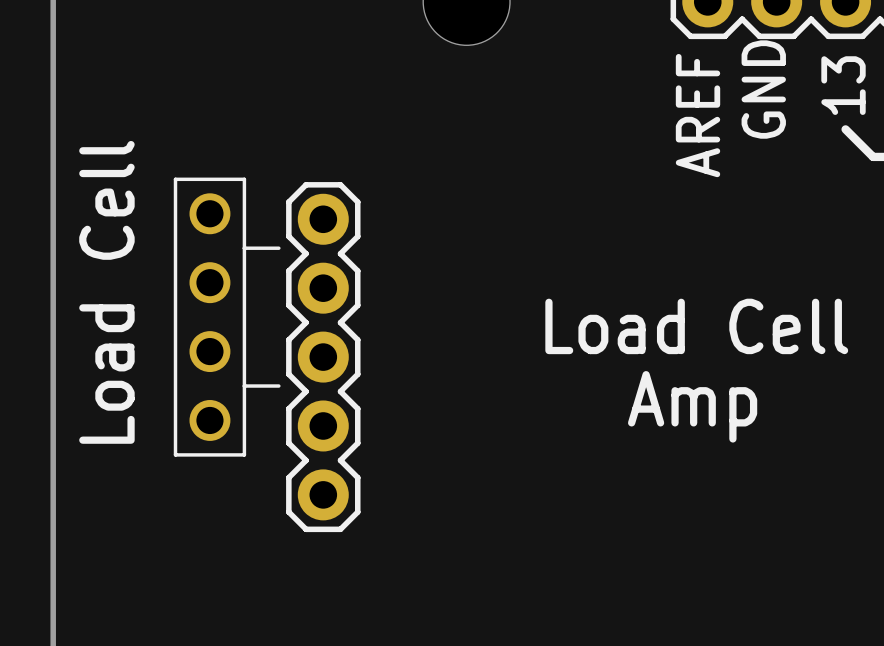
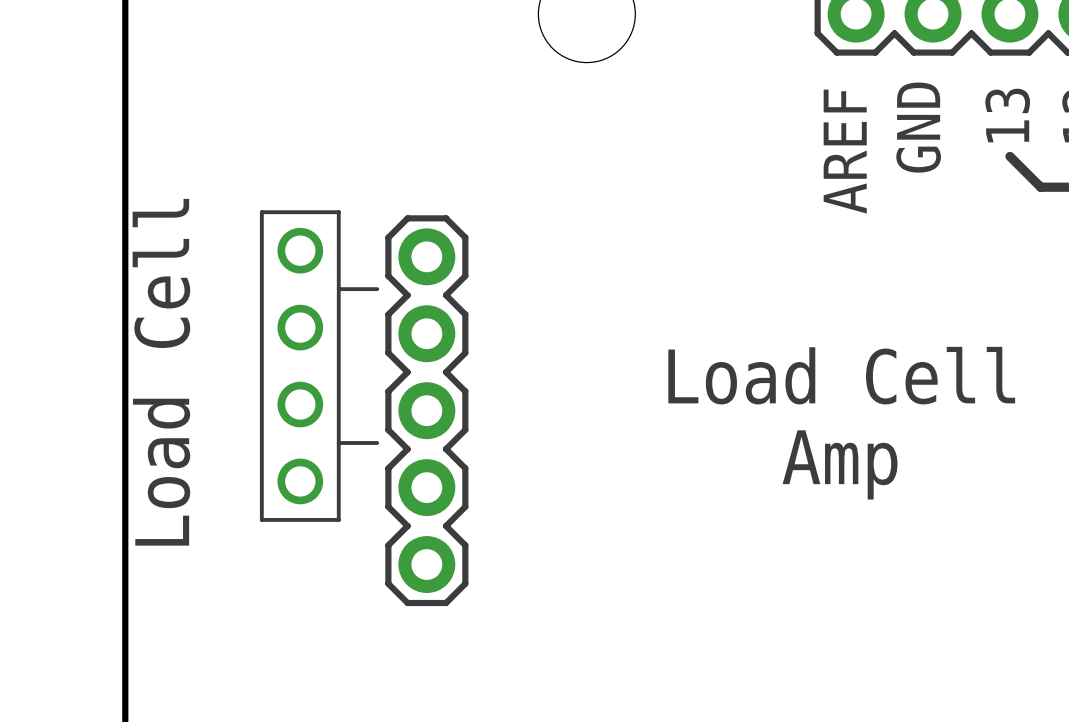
text position: Load Cell (106, 292) -> Load Cell (161, 372)

